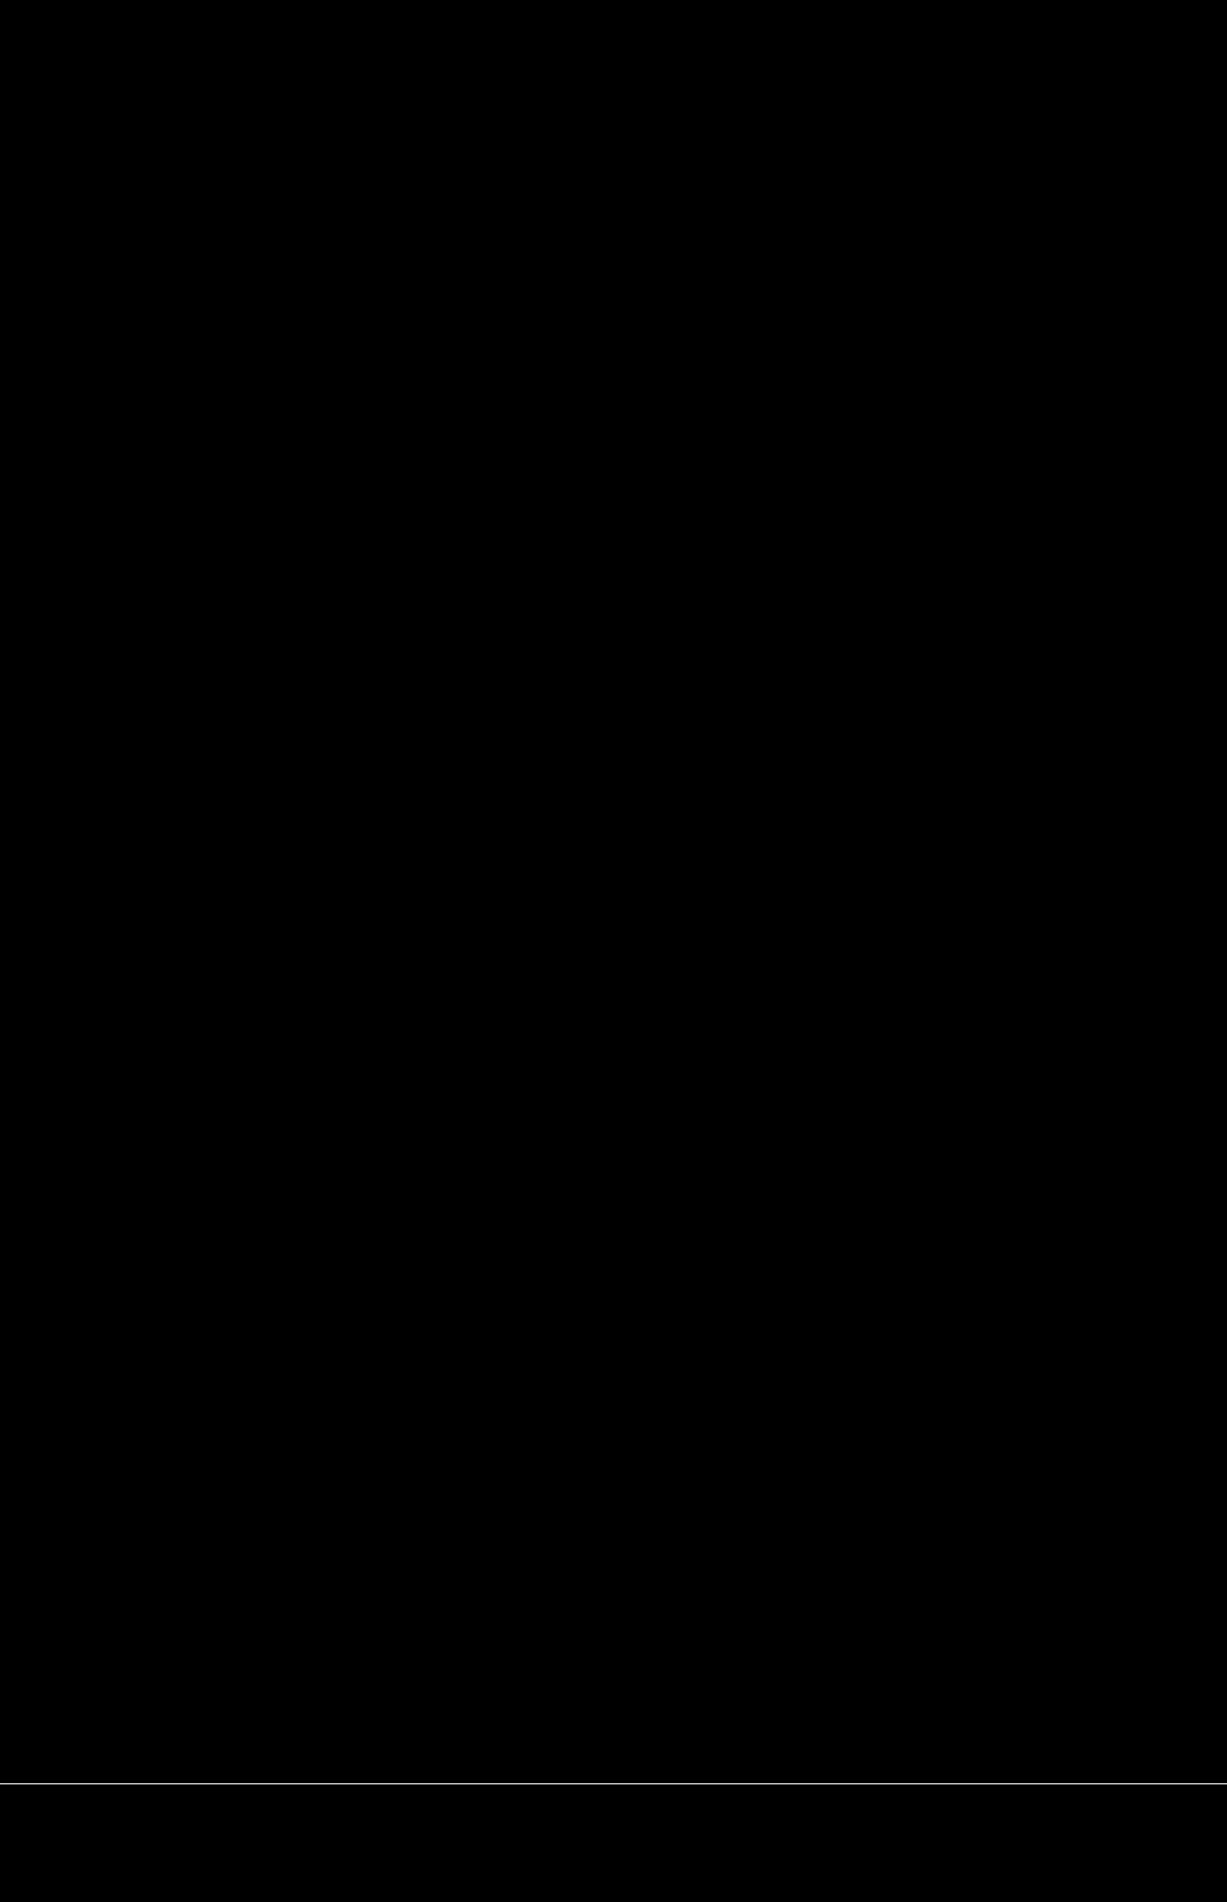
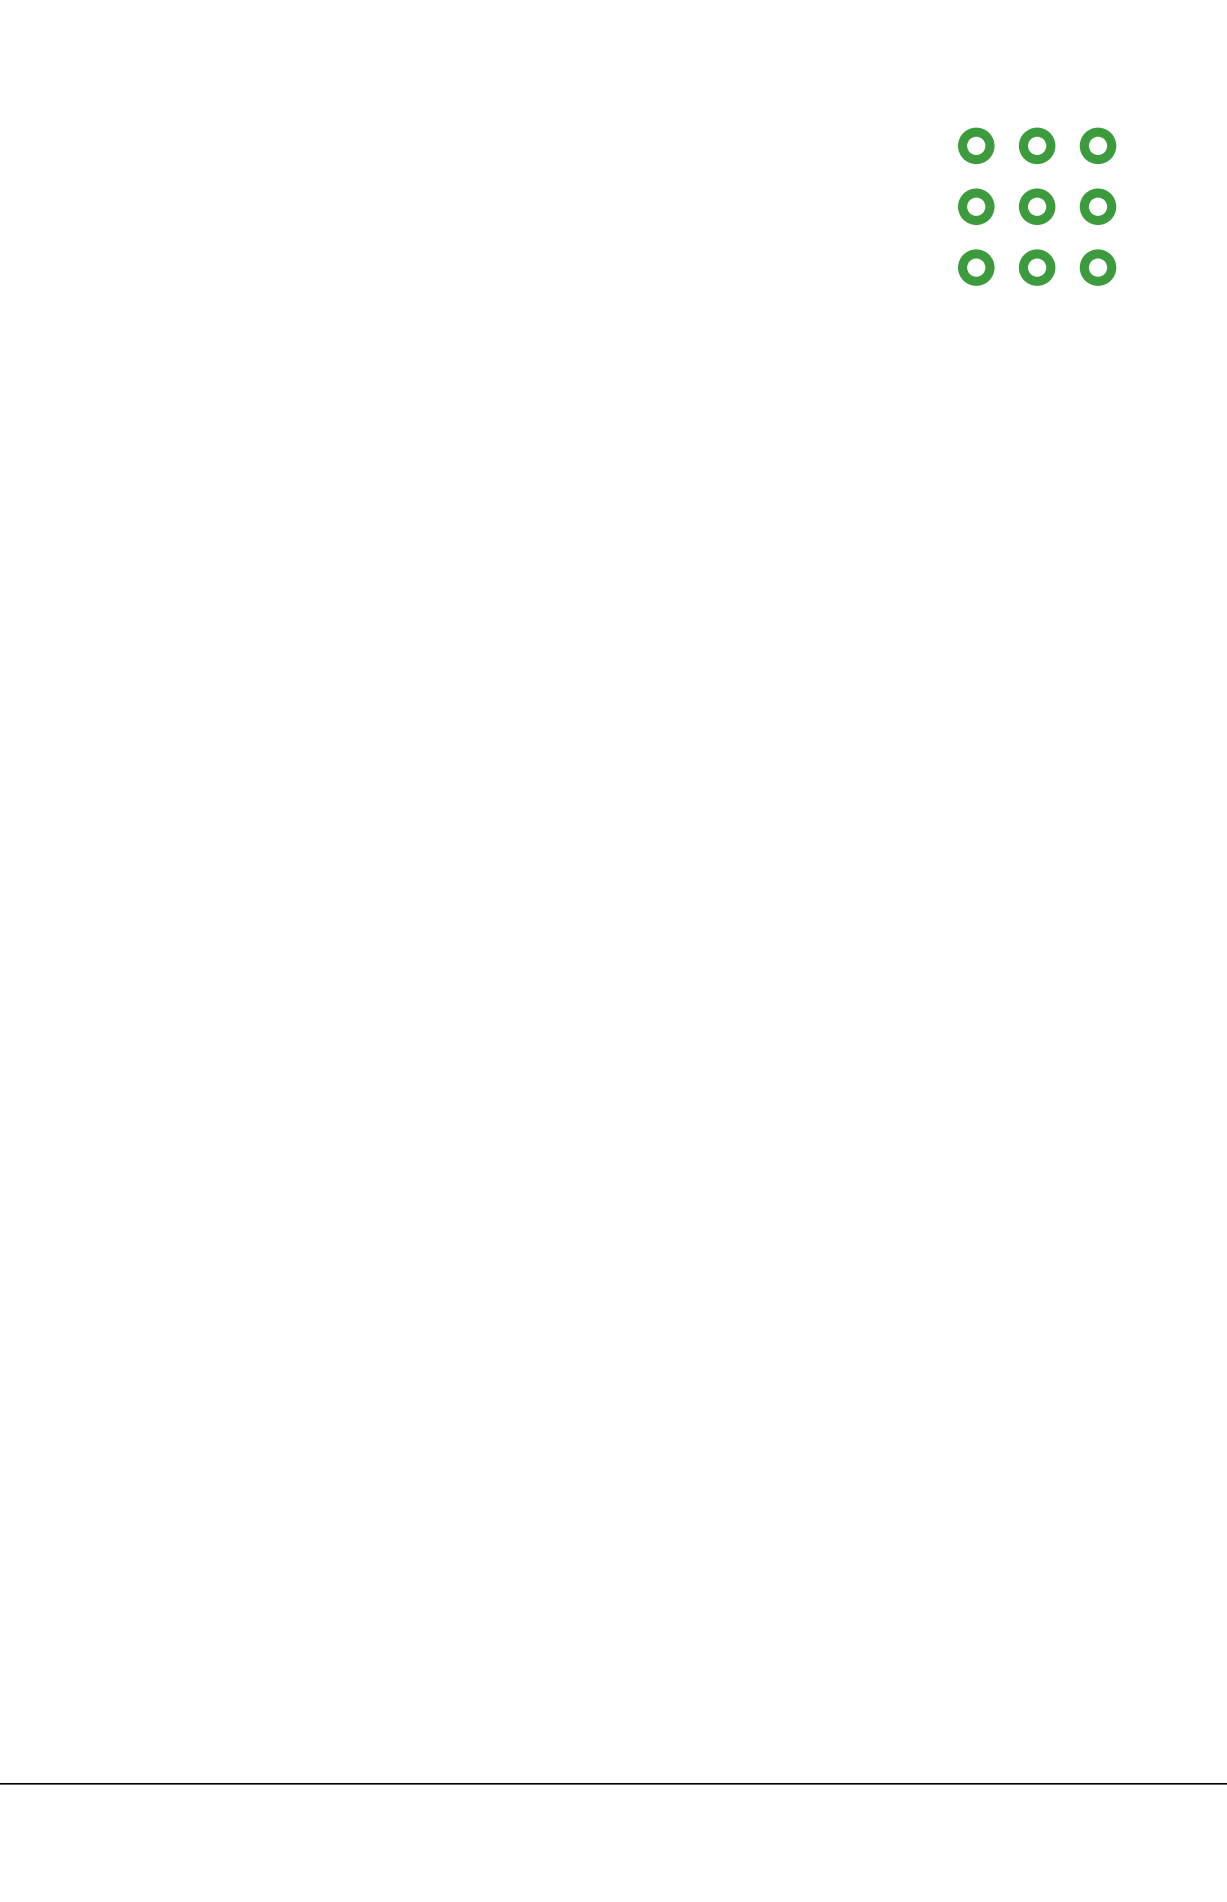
part: none -> (1037, 206)

